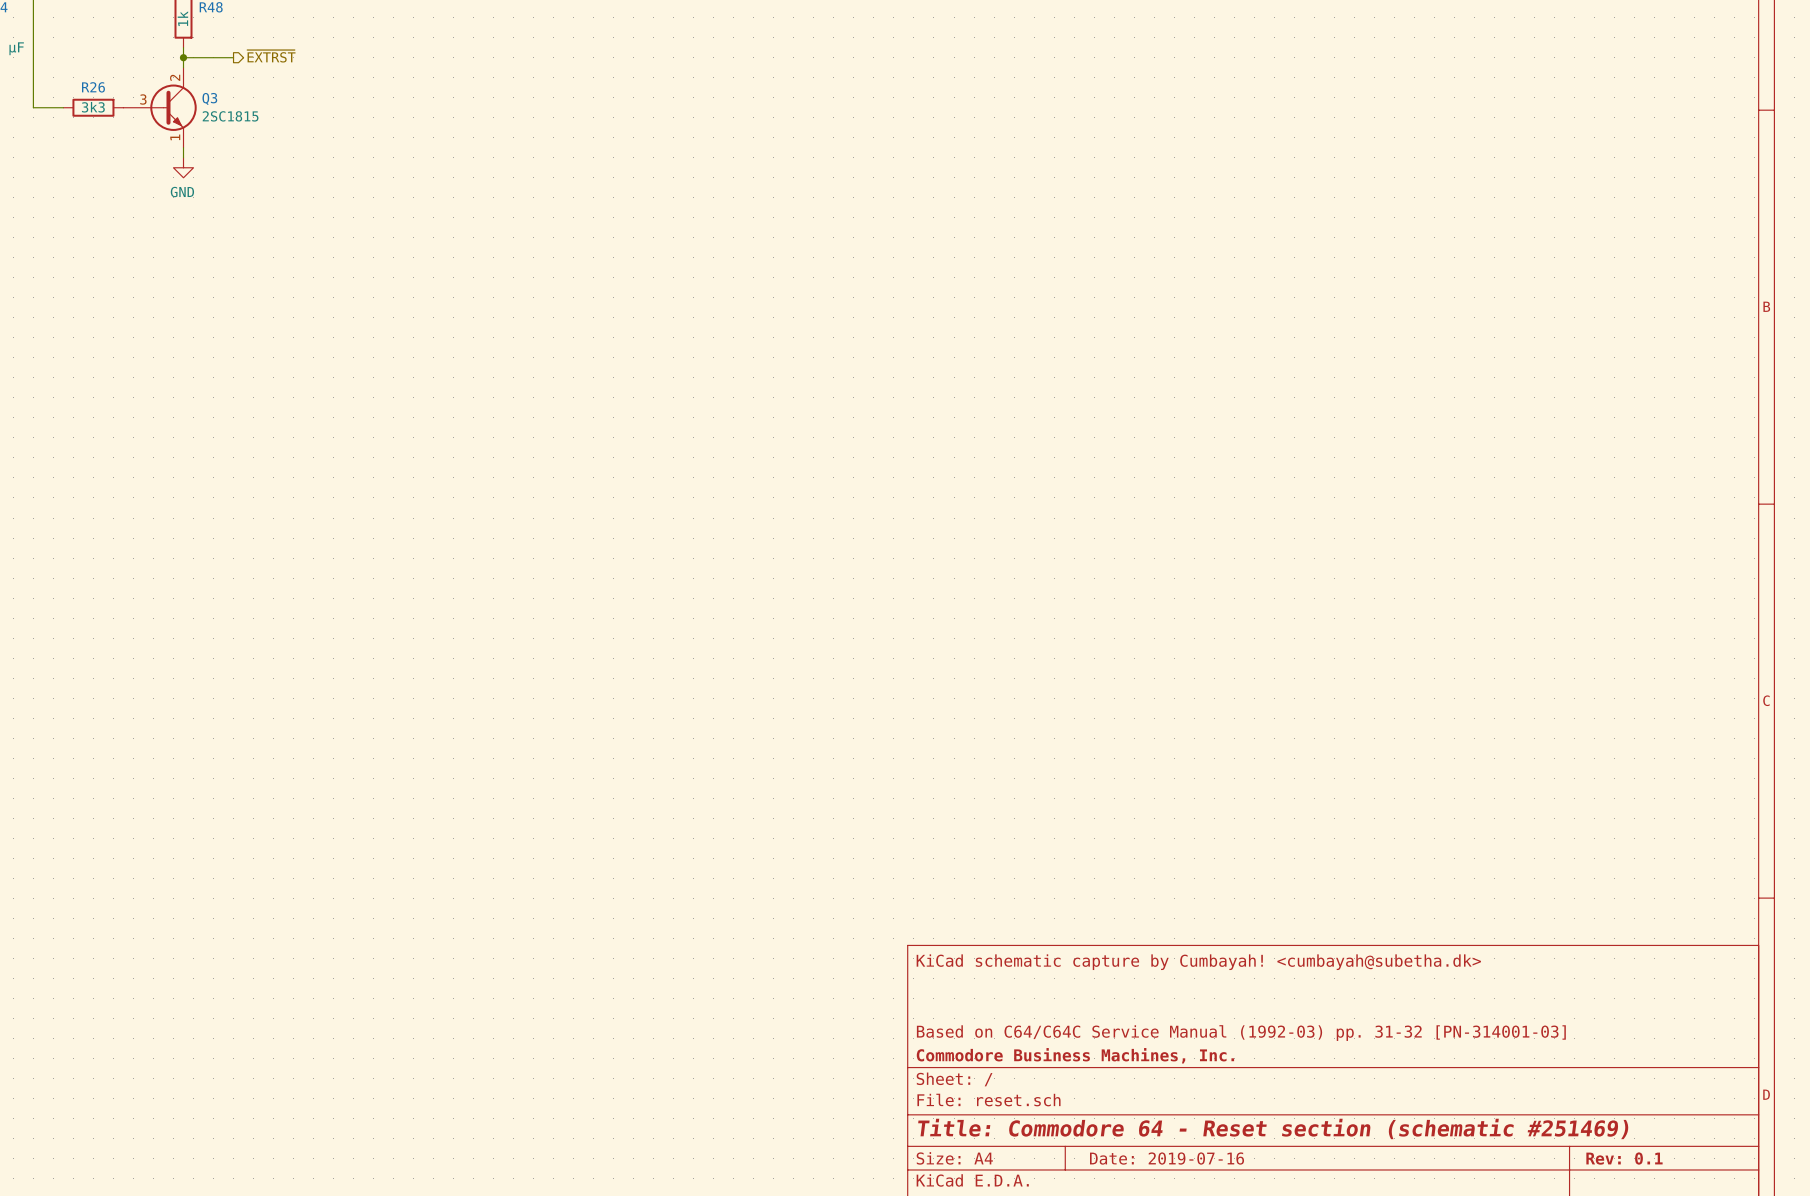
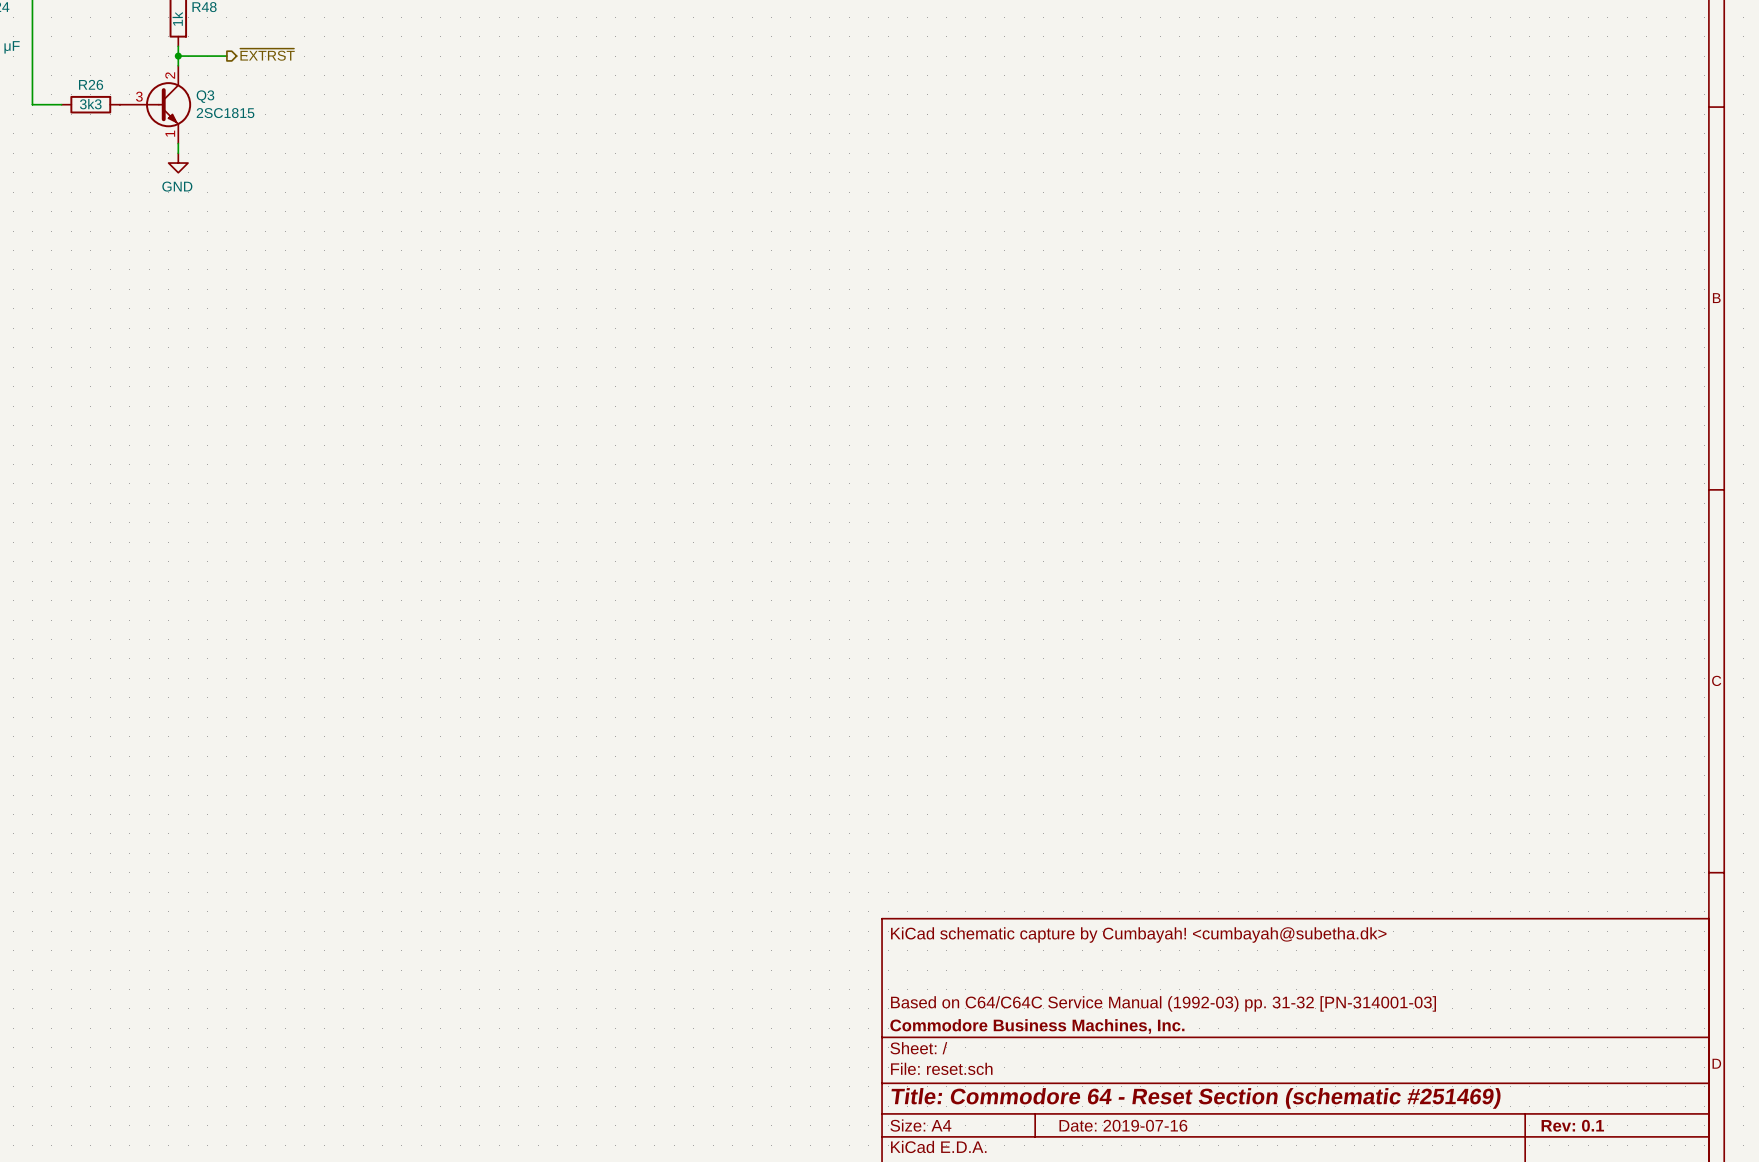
title block: Title: Commodore 64 - Reset section (schematic #251469) (1273, 1128) -> Title: Commodore 64 - Reset Section (schematic #251469) (1196, 1098)

